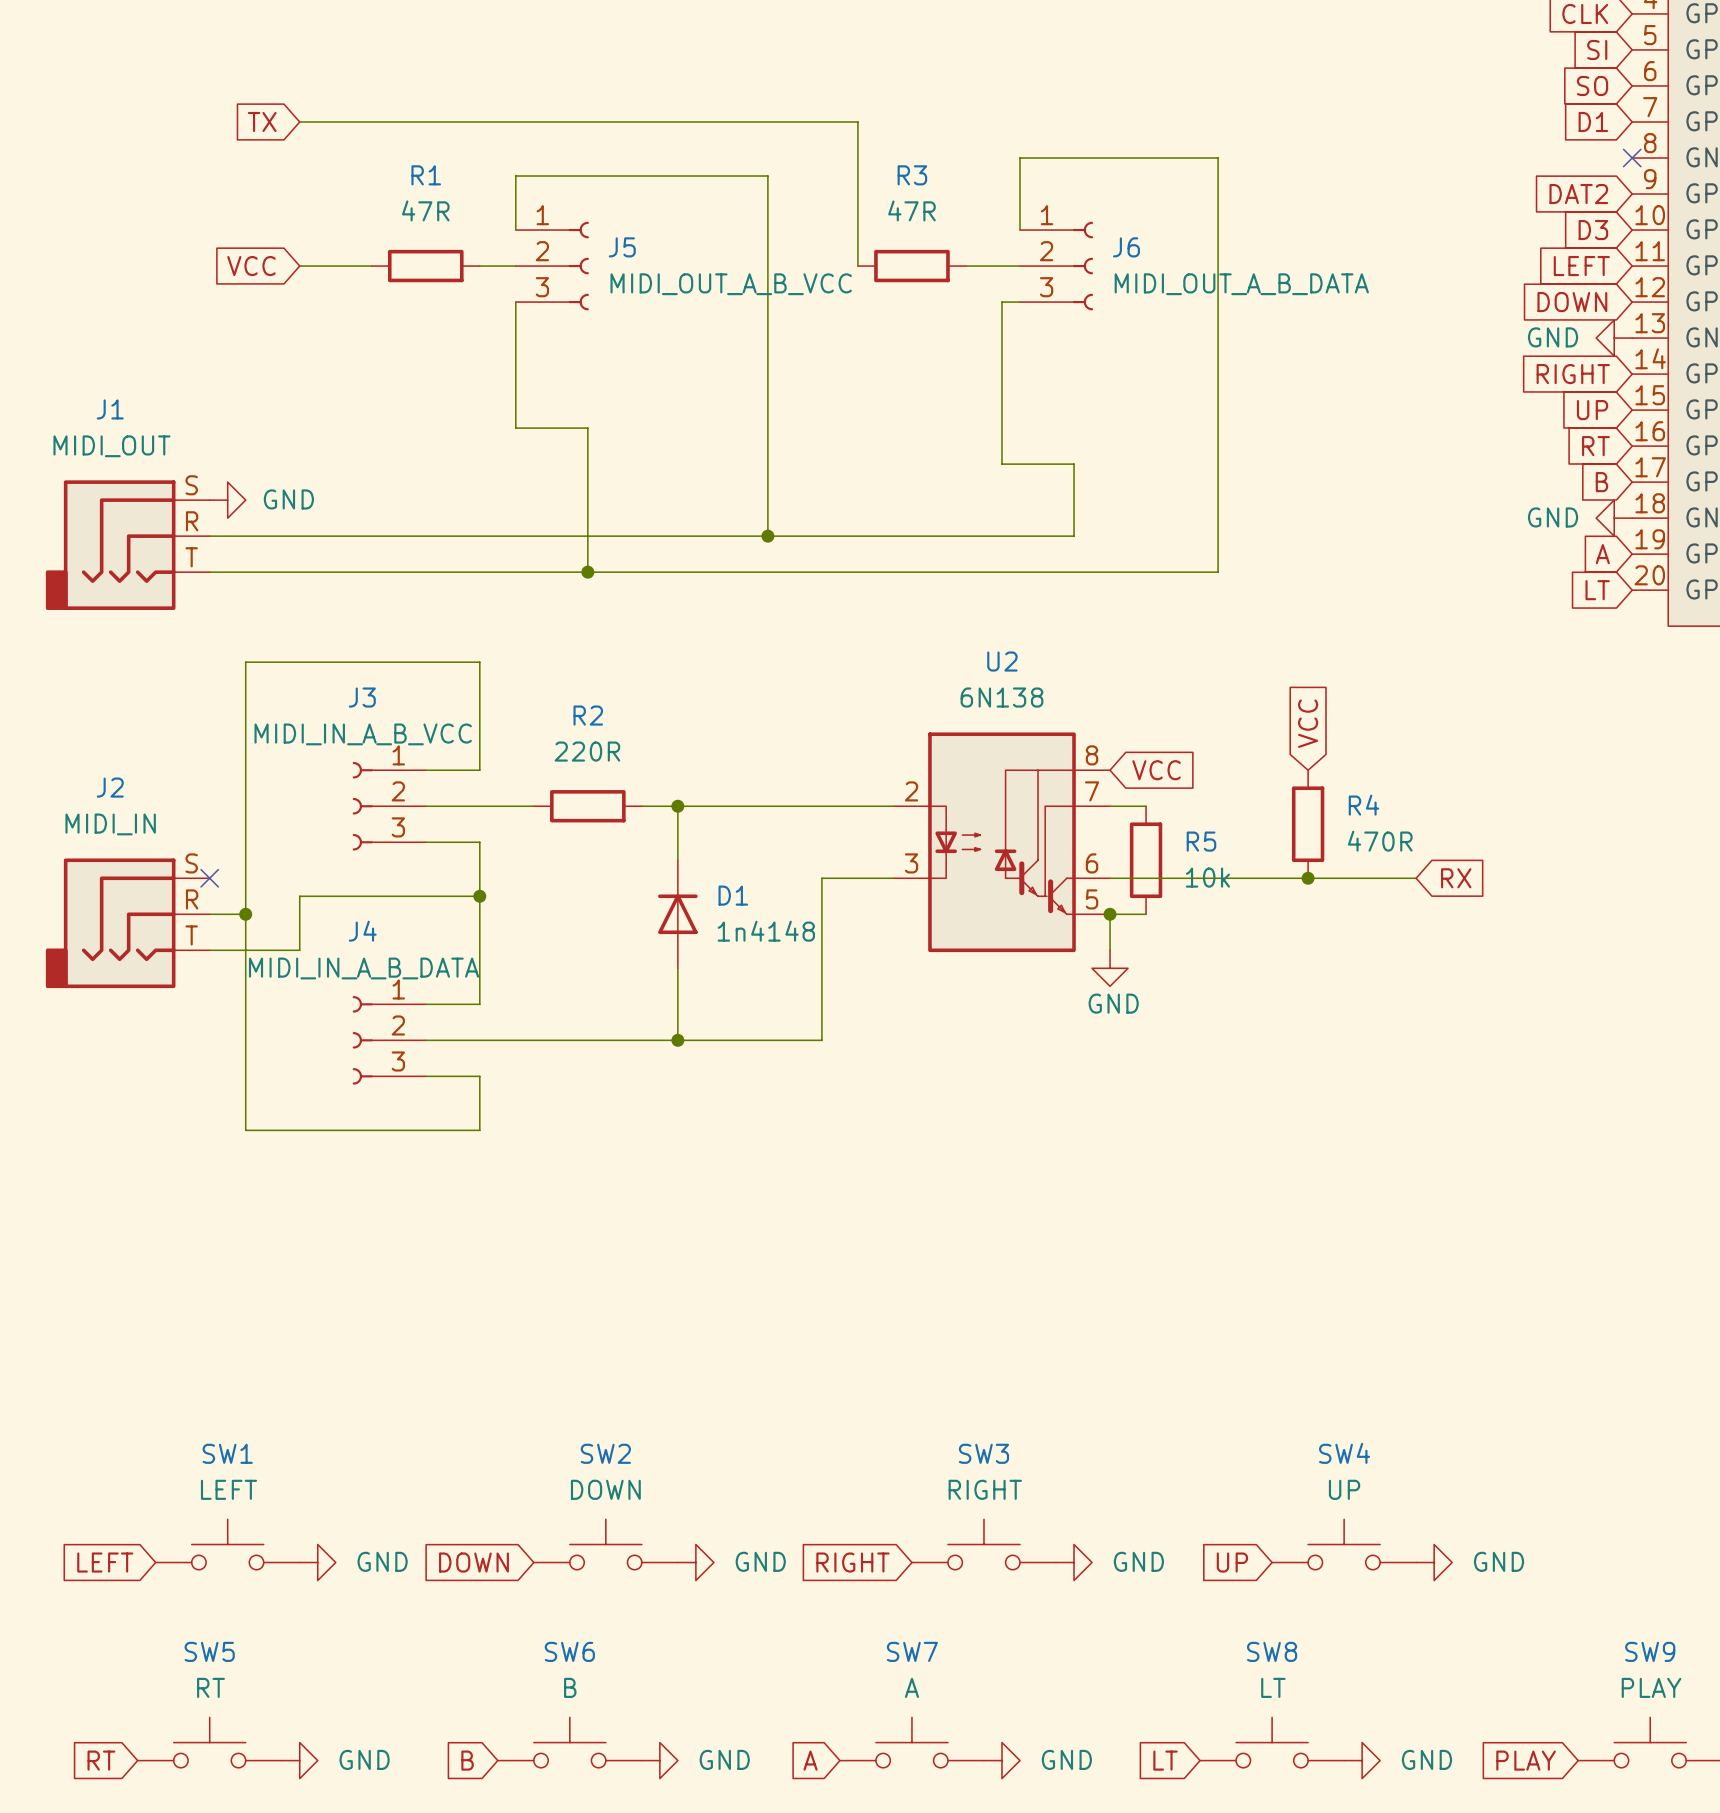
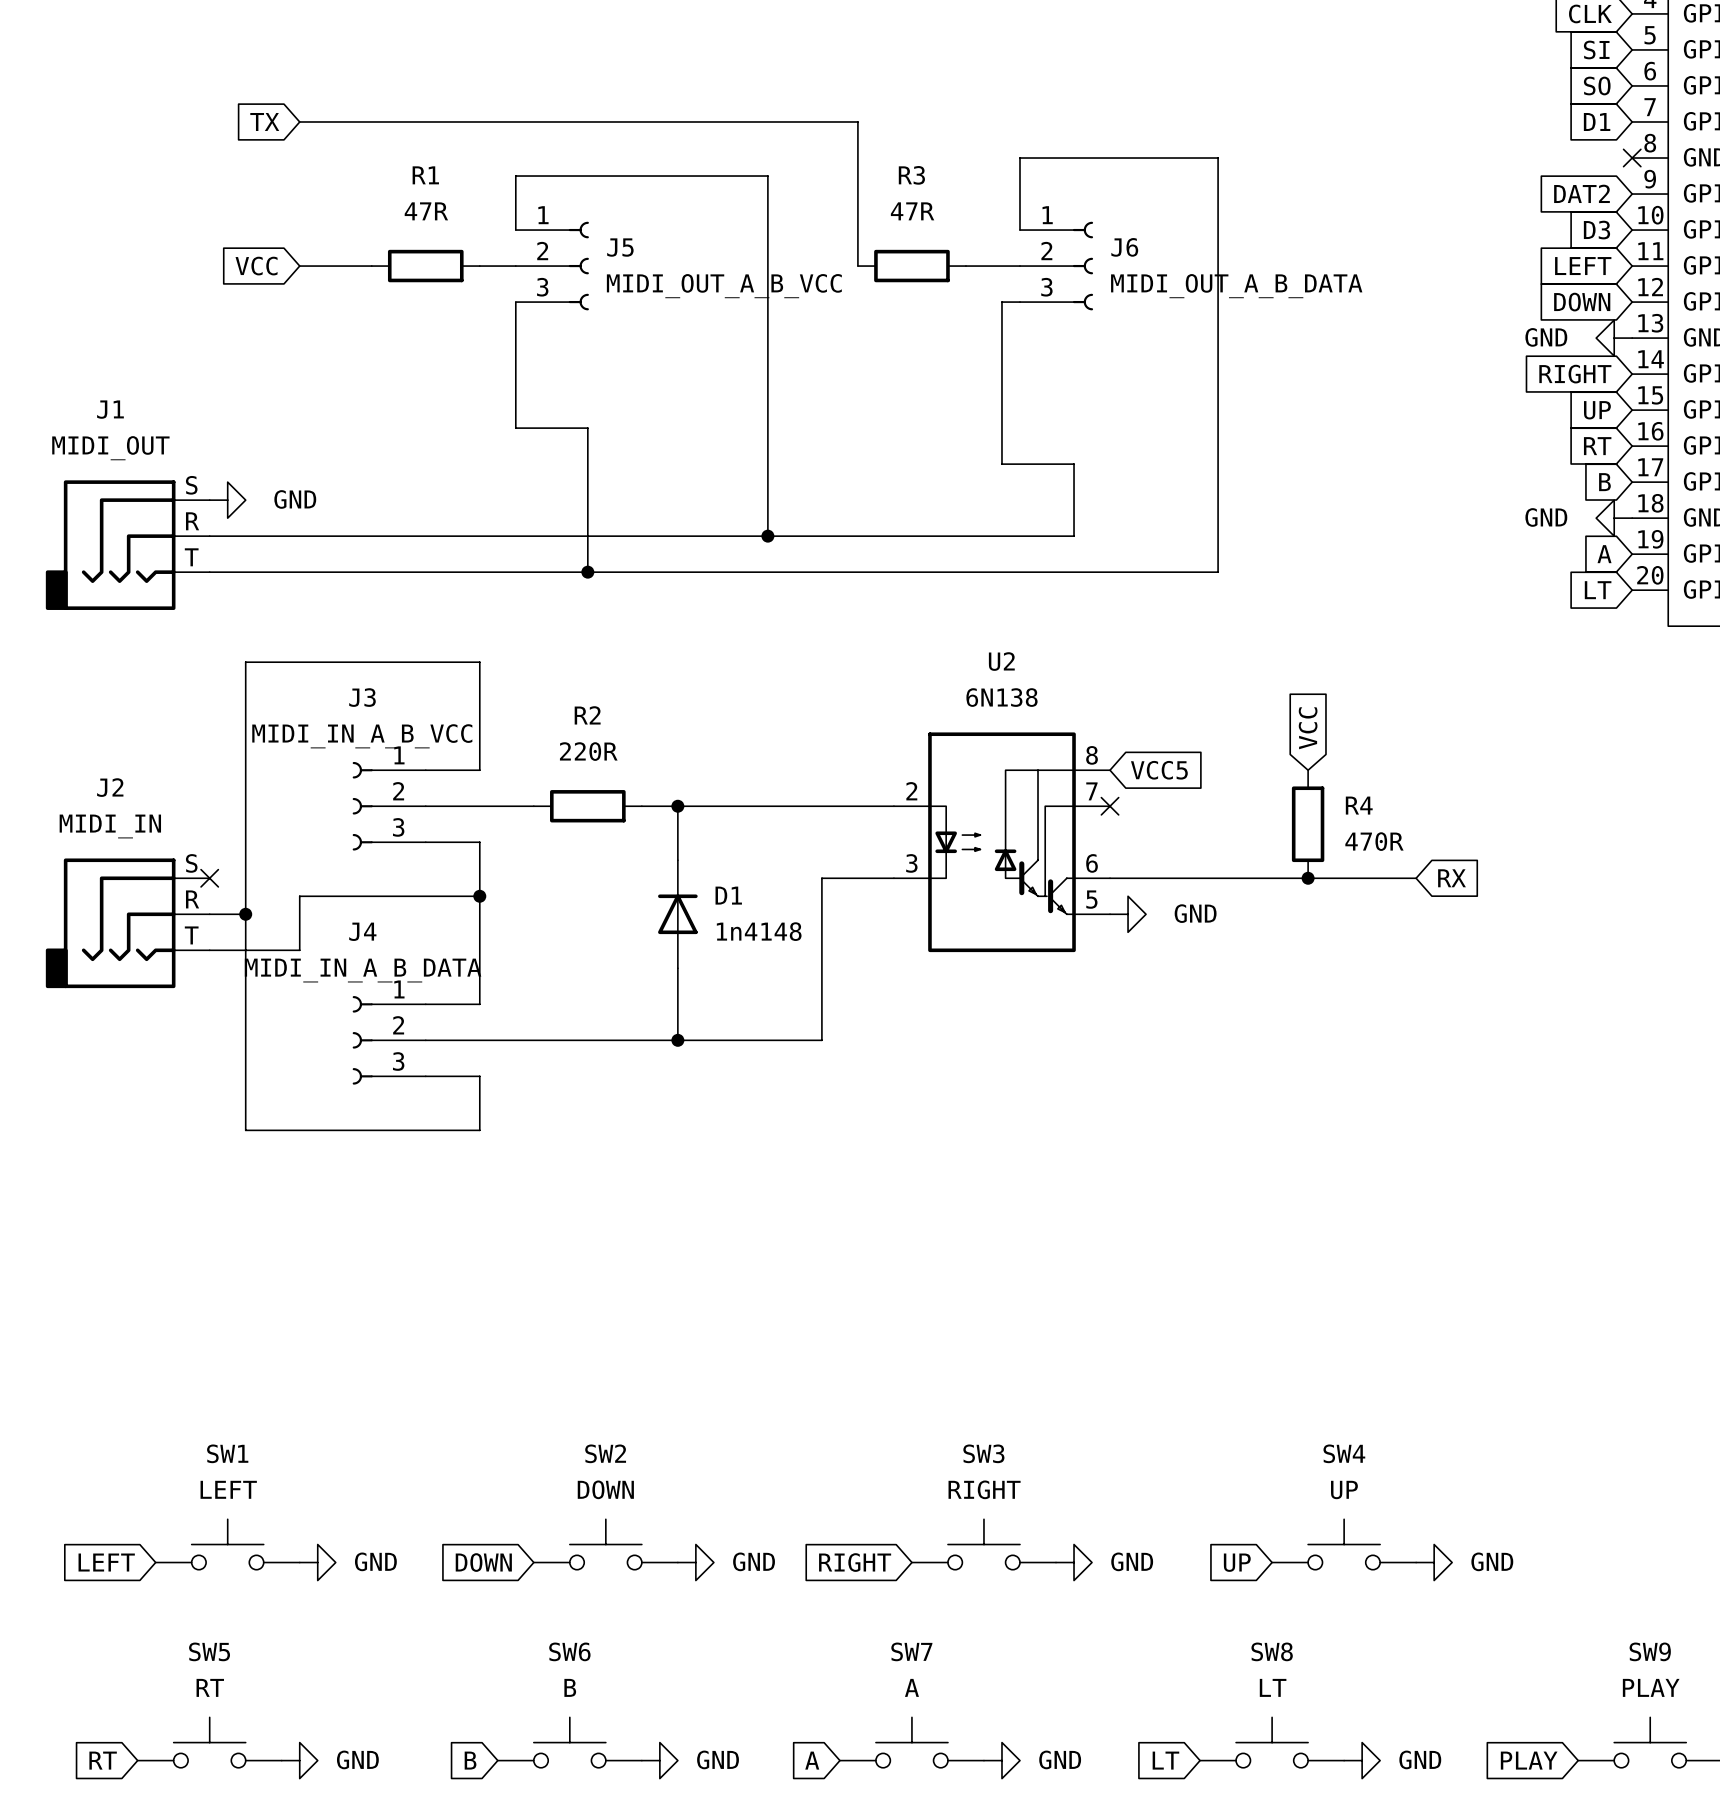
global label: VCC (1156, 770) -> VCC5 (1159, 770)
wire: (1110, 806) (1146, 806) -> none
no-connect mark: none -> (1110, 806)
R5: 10k (1146, 860) -> none
junction: (1110, 914) -> none
wire: (1146, 914) (1110, 914) (1110, 950) -> none
power symbol rotation: 0° (1110, 968) -> 90° counterclockwise (1128, 914)
power symbol position: GND (1110, 968) -> GND (1128, 914)

